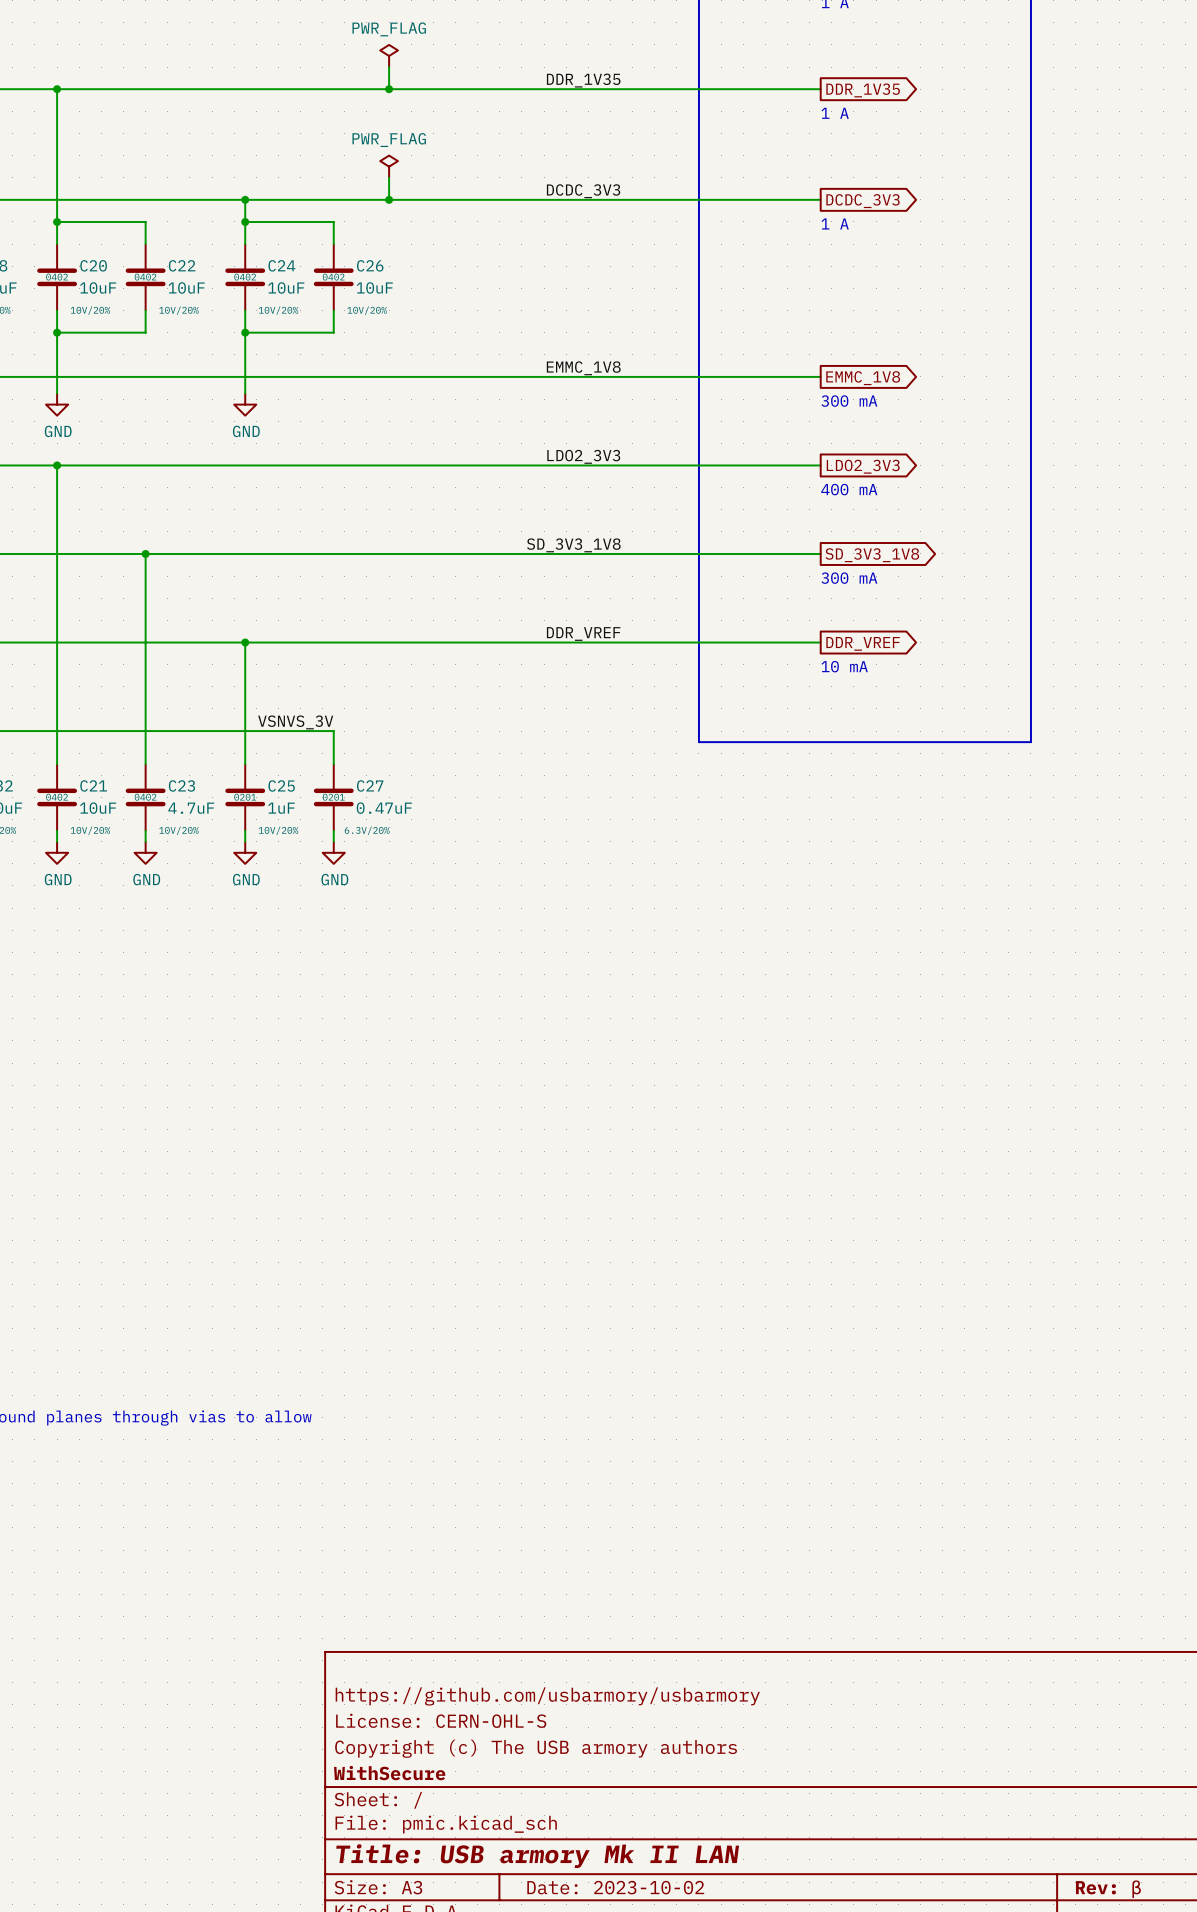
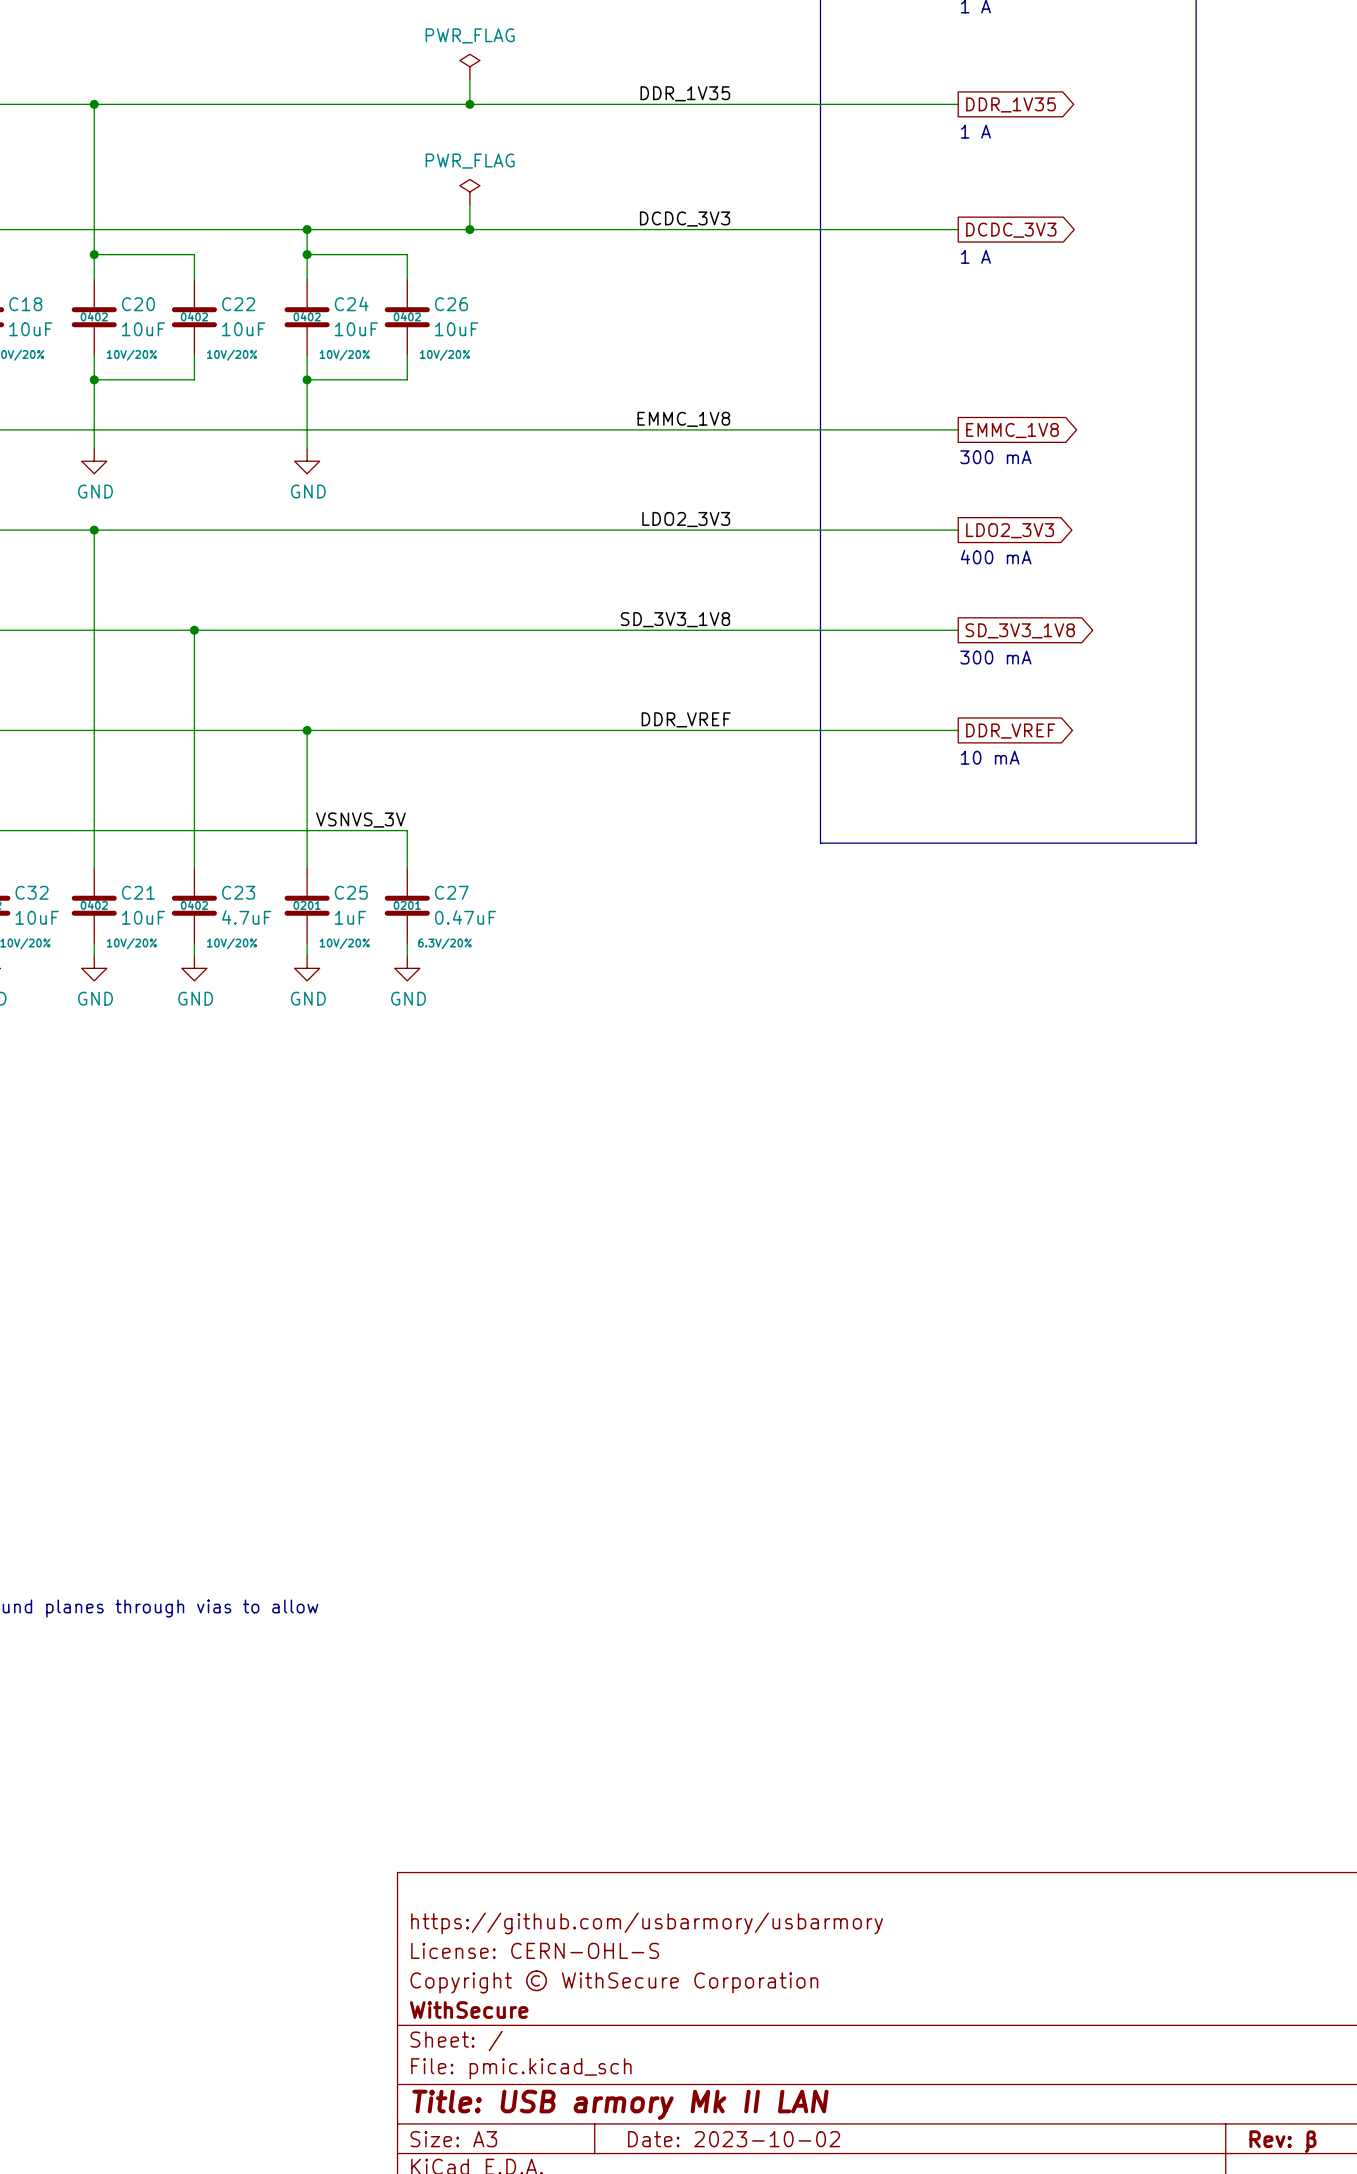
title block: Copyright (c) The USB armory authors (536, 1748) -> Copyright © WithSecure Corporation (614, 1981)

